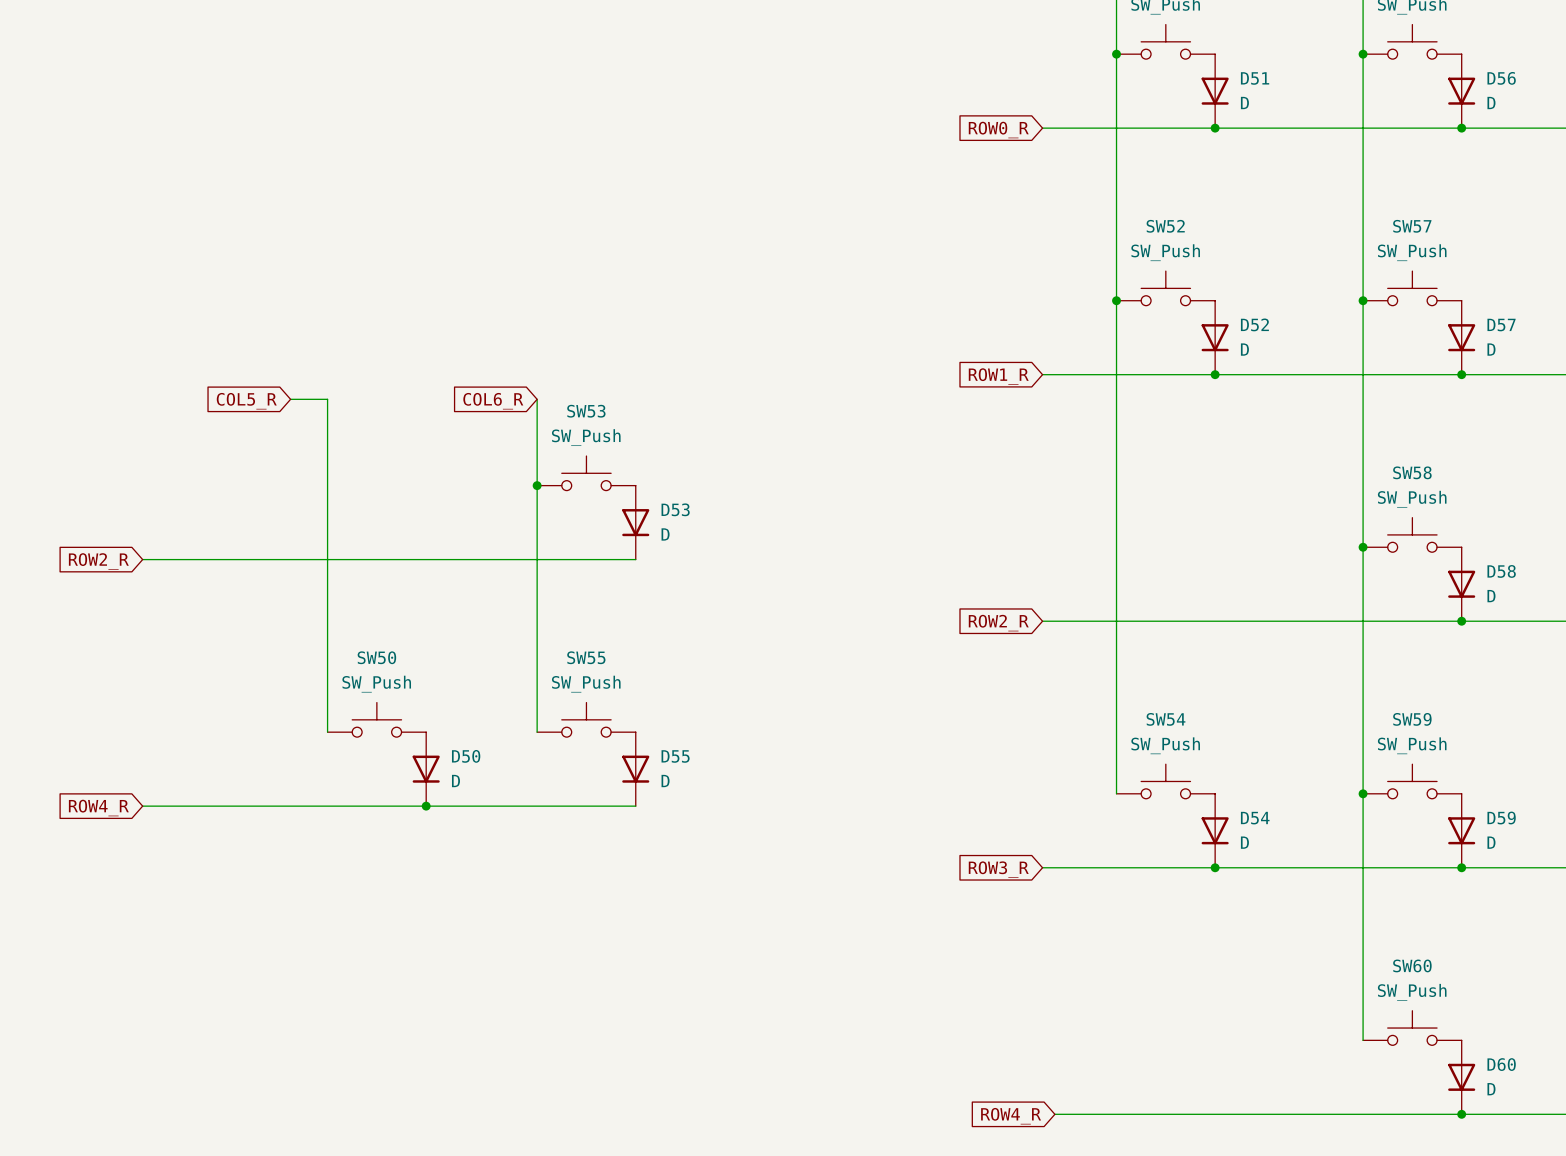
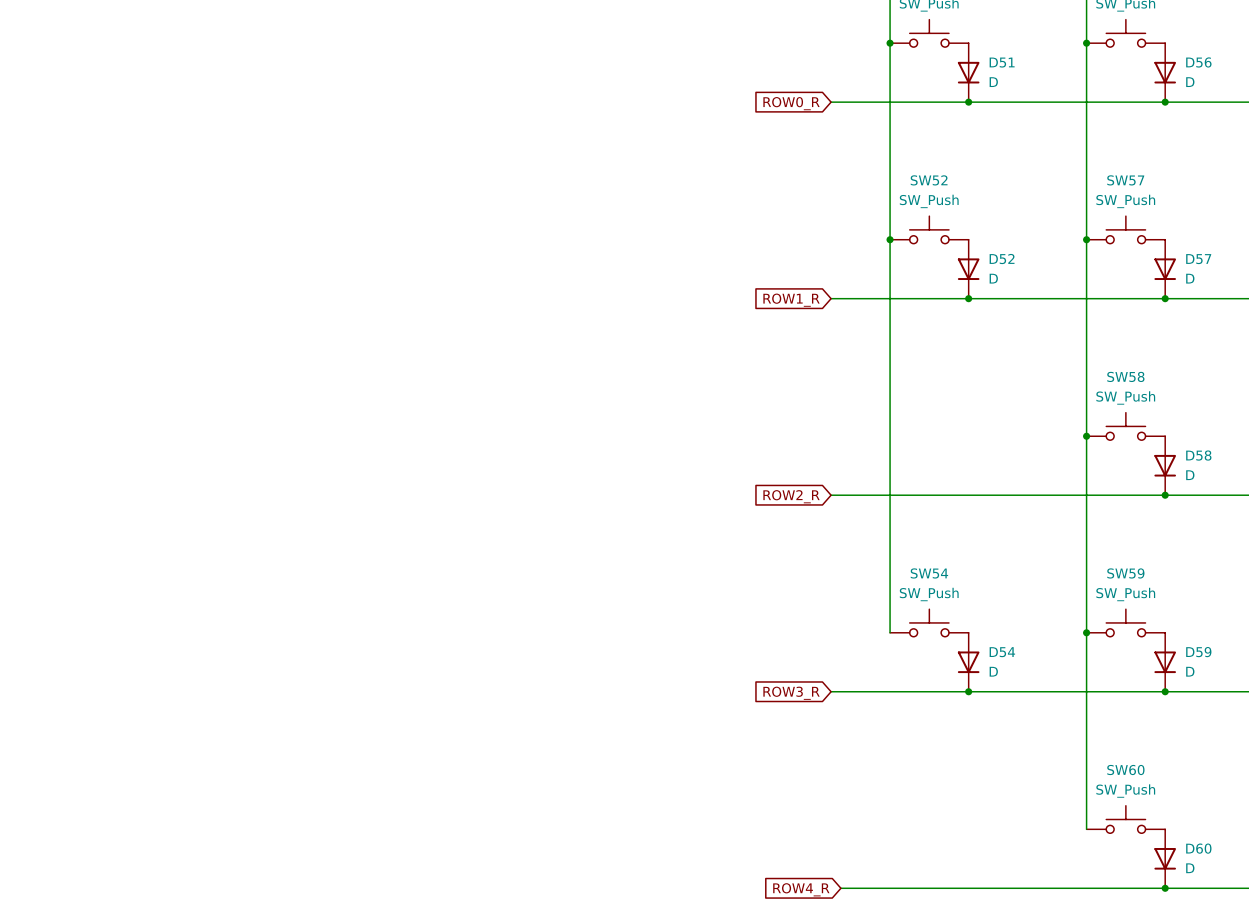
wire: (290, 399) (327, 399) (327, 732) -> none
wire: (537, 399) (537, 732) -> none
global label: COL5_R (246, 401) -> none
global label: COL6_R (493, 401) -> none
SW53: SW_Push (586, 473) -> none
junction: (537, 485) -> none
D53: D (635, 522) -> none
wire: (142, 559) (635, 559) -> none
global label: ROW2_R (98, 561) -> none
SW50: SW_Push (376, 719) -> none
SW55: SW_Push (586, 719) -> none
D50: D (426, 769) -> none
D55: D (635, 769) -> none
wire: (142, 806) (635, 806) -> none
junction: (426, 806) -> none
global label: ROW4_R (98, 808) -> none

